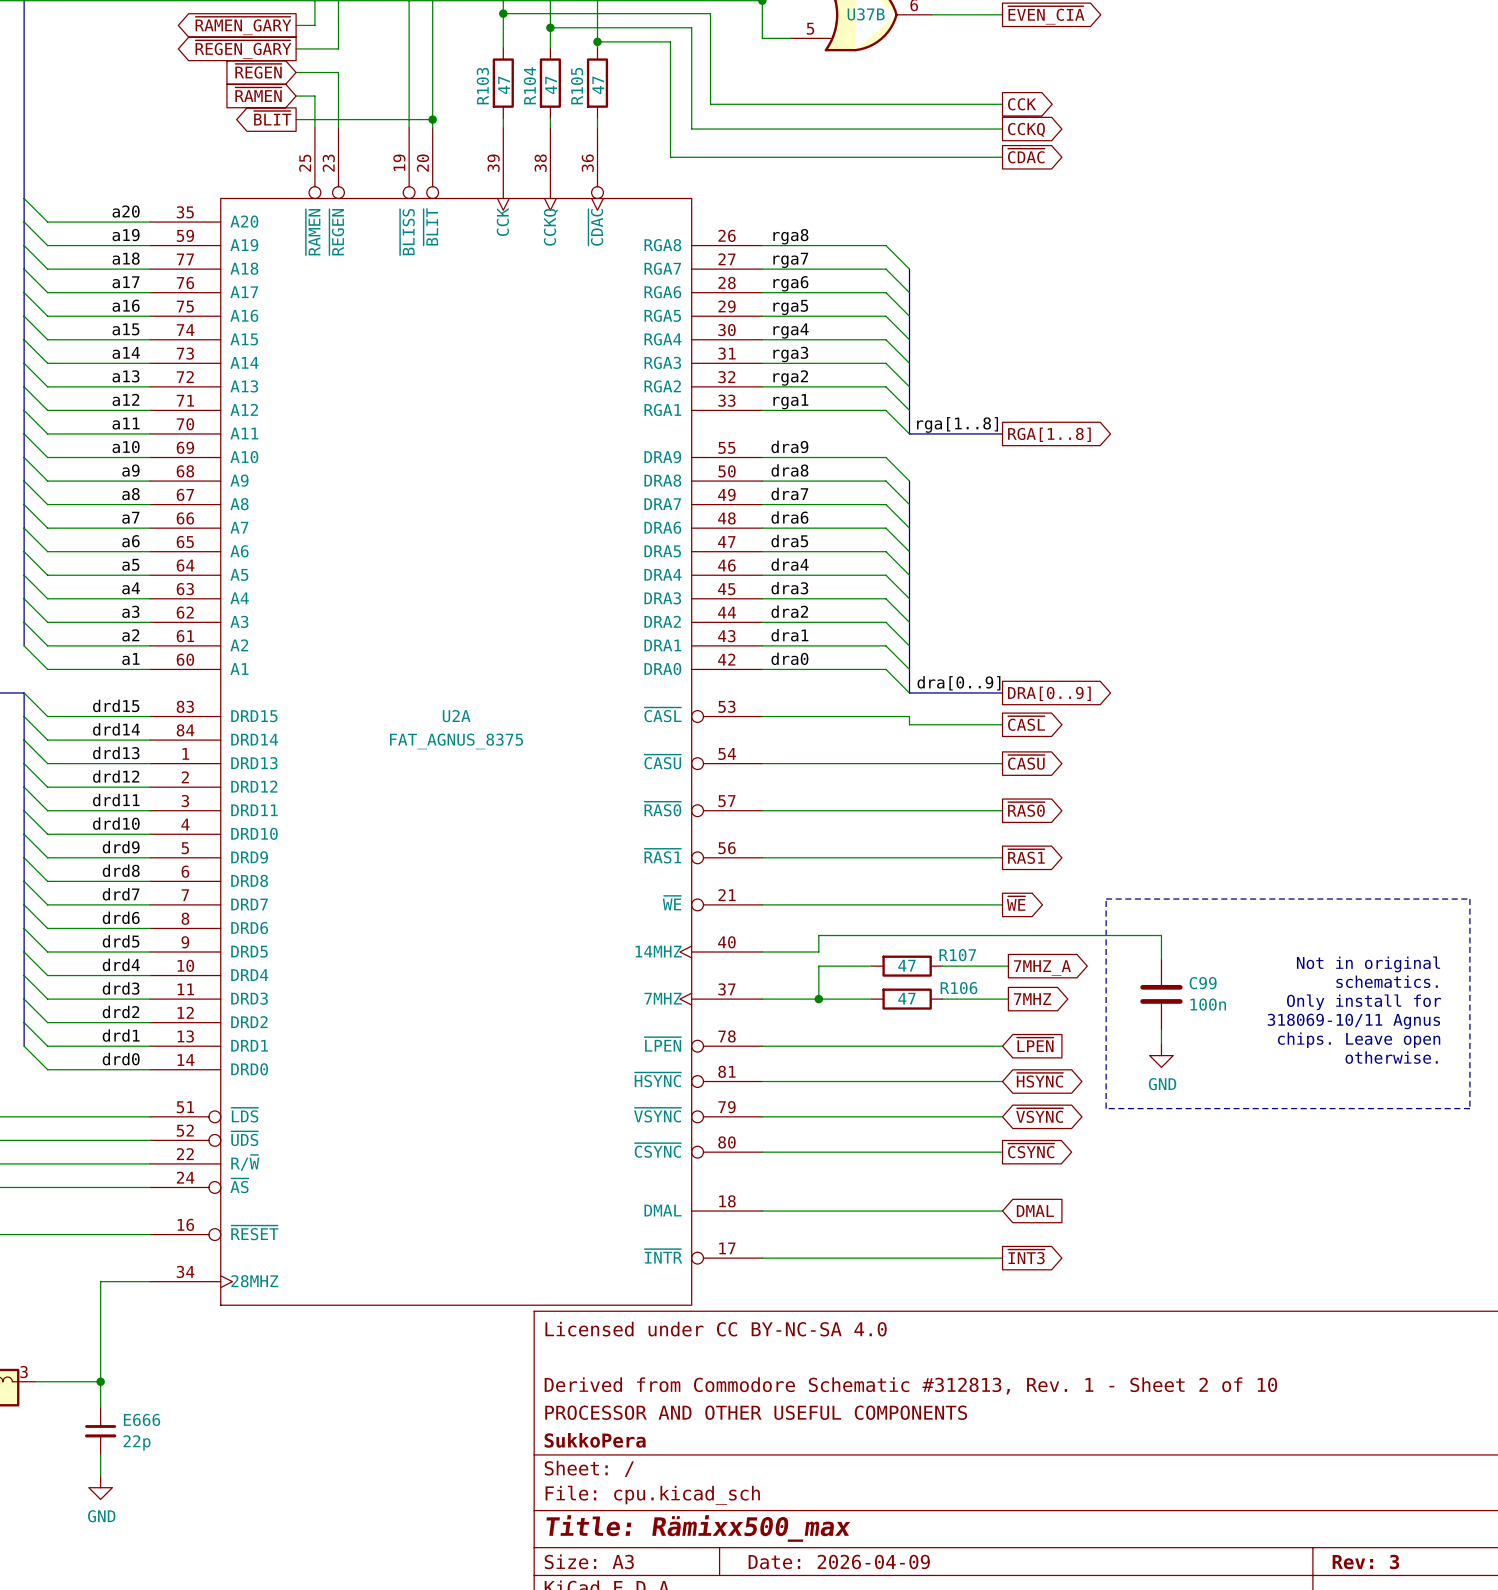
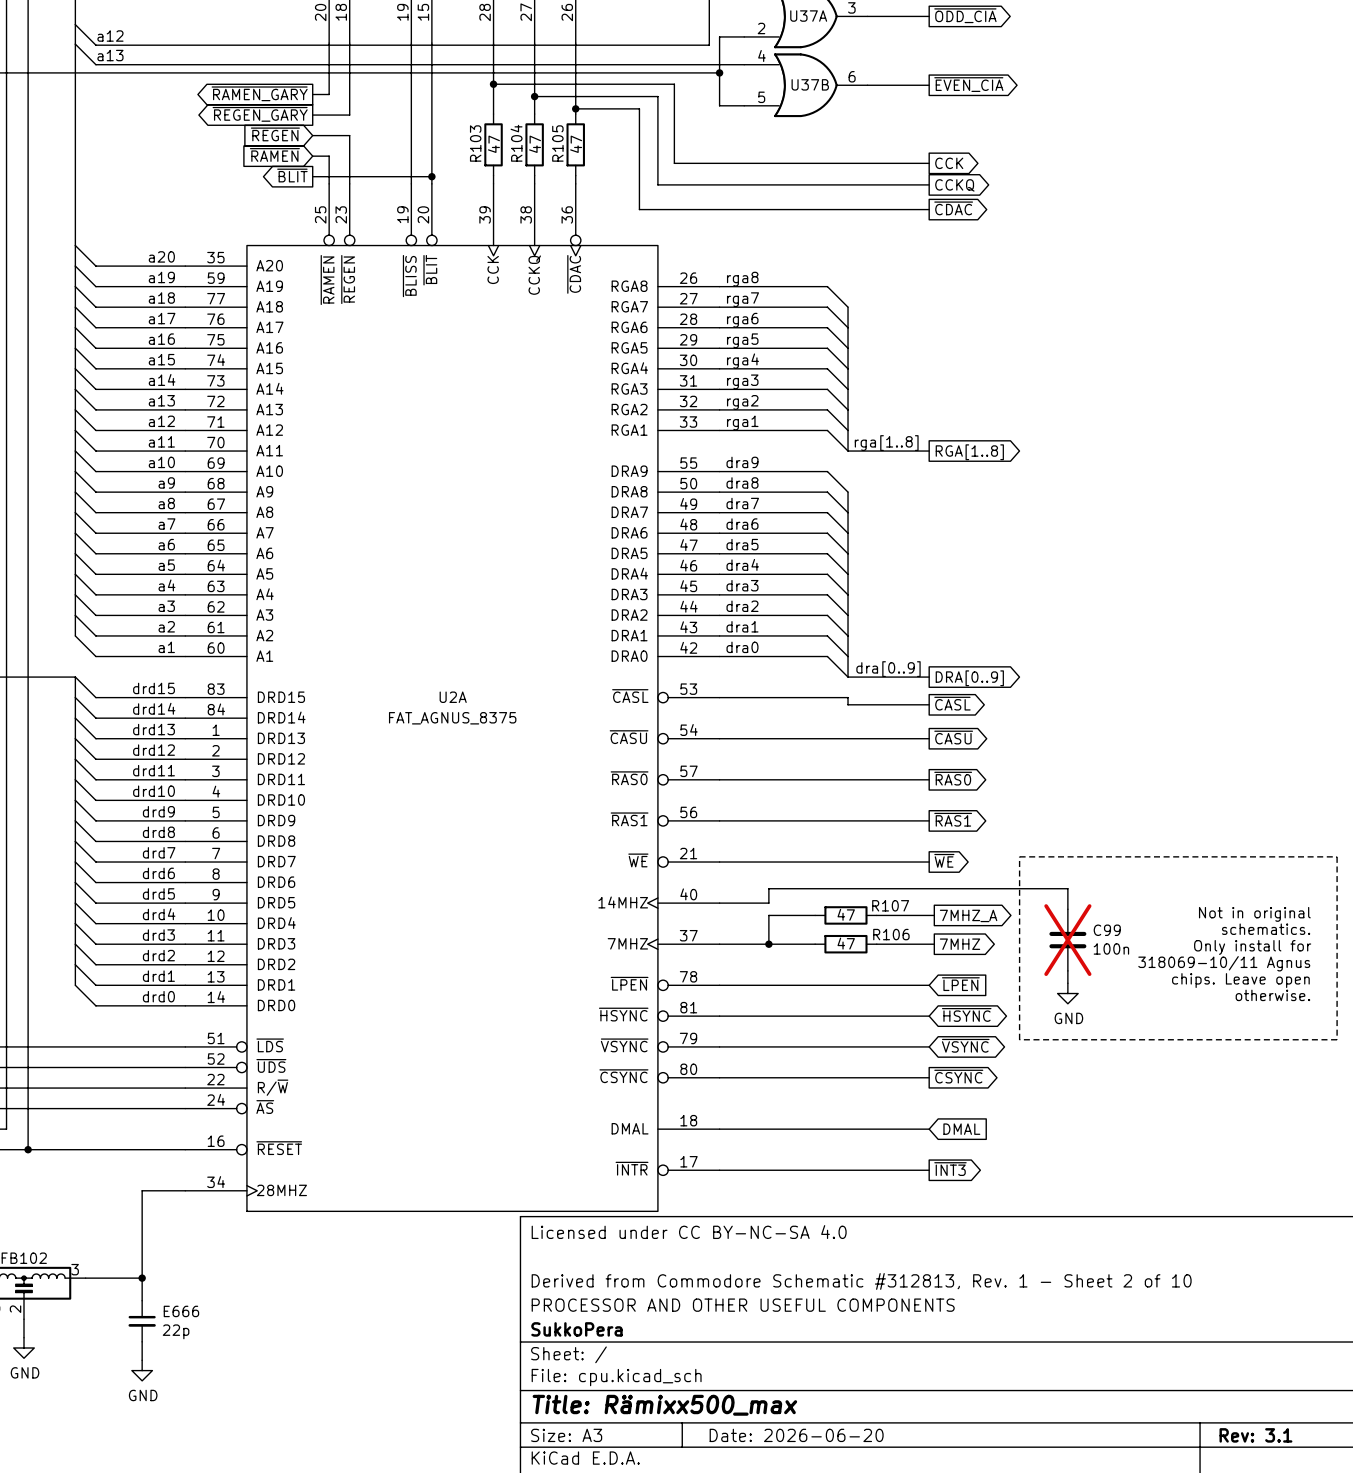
C99 do-not-place cross: none -> (1067, 940)
title block: Date: 2026-04-09 (839, 1561) -> Date: 2026-06-20 (796, 1435)
title block: Rev: 3 (1365, 1561) -> Rev: 3.1 (1255, 1435)

